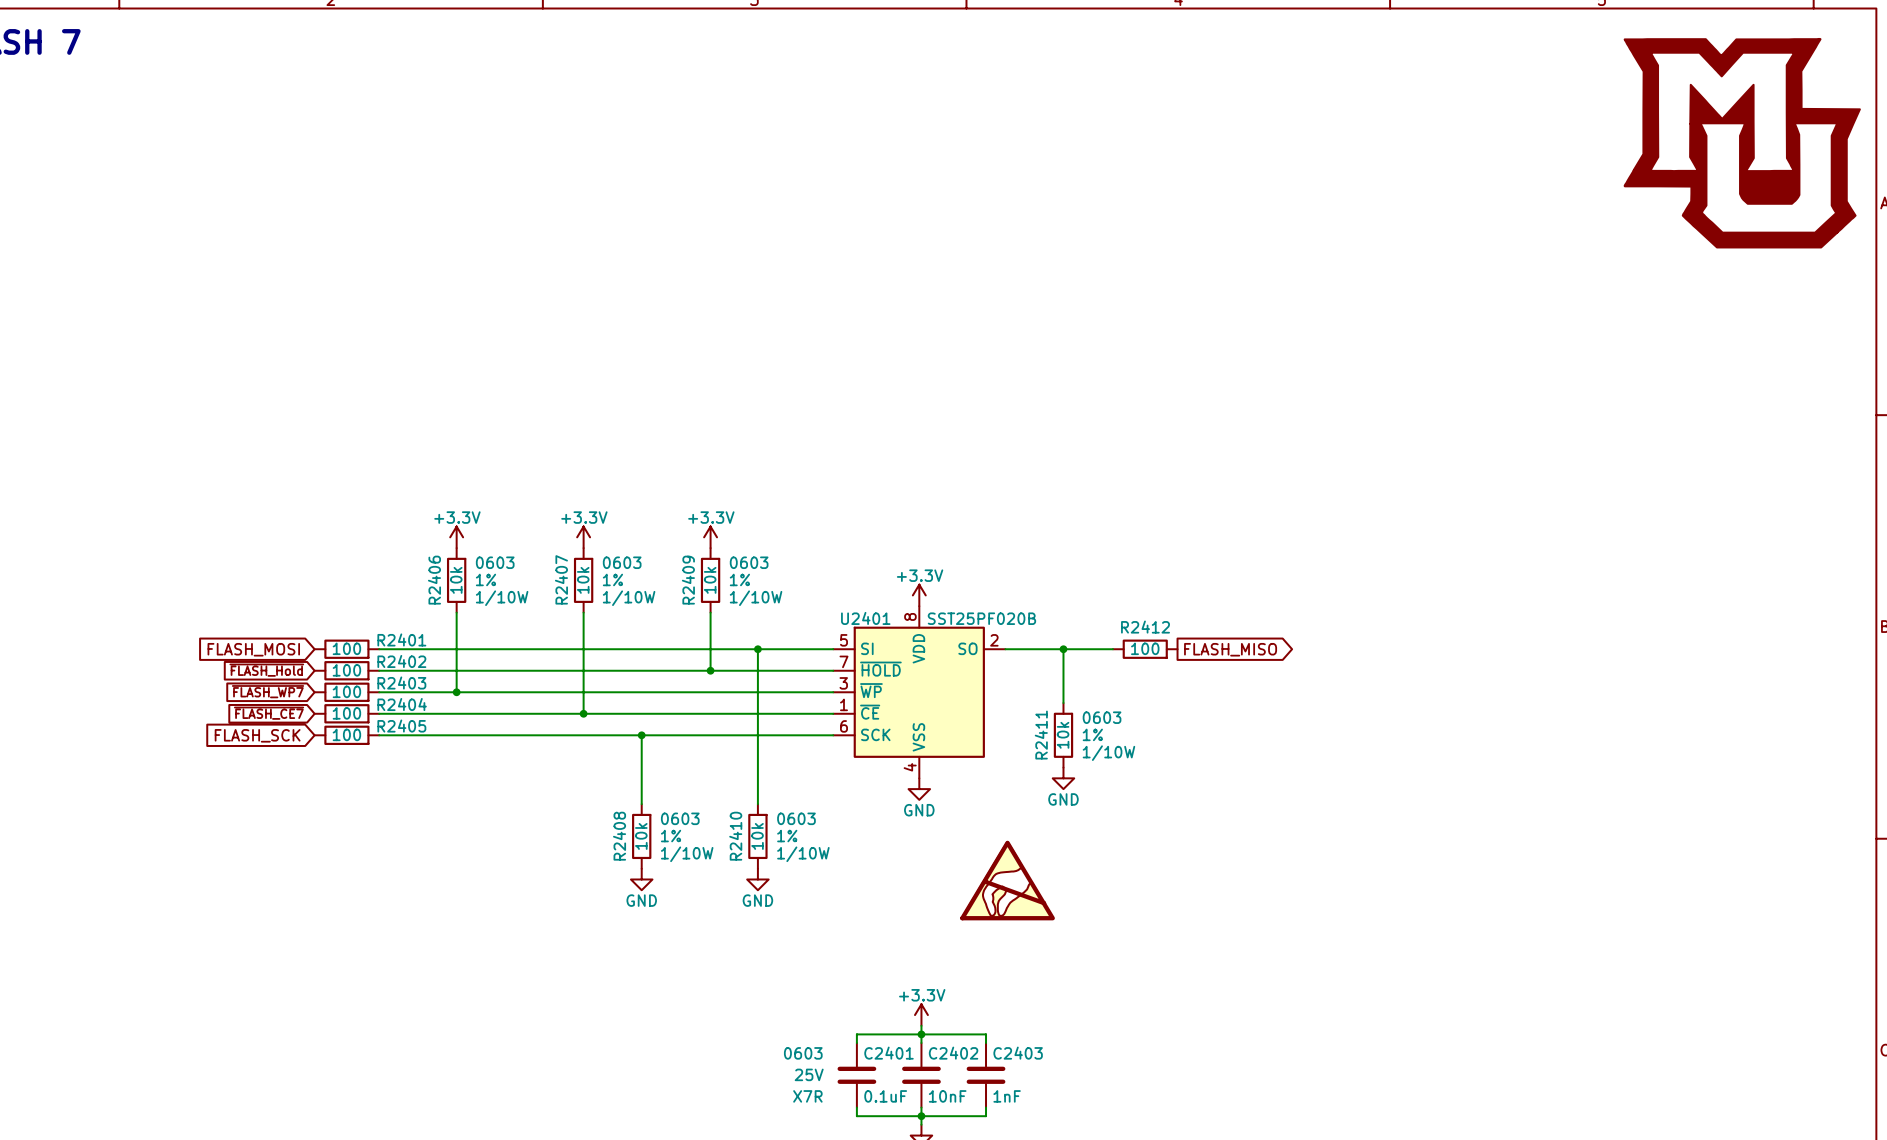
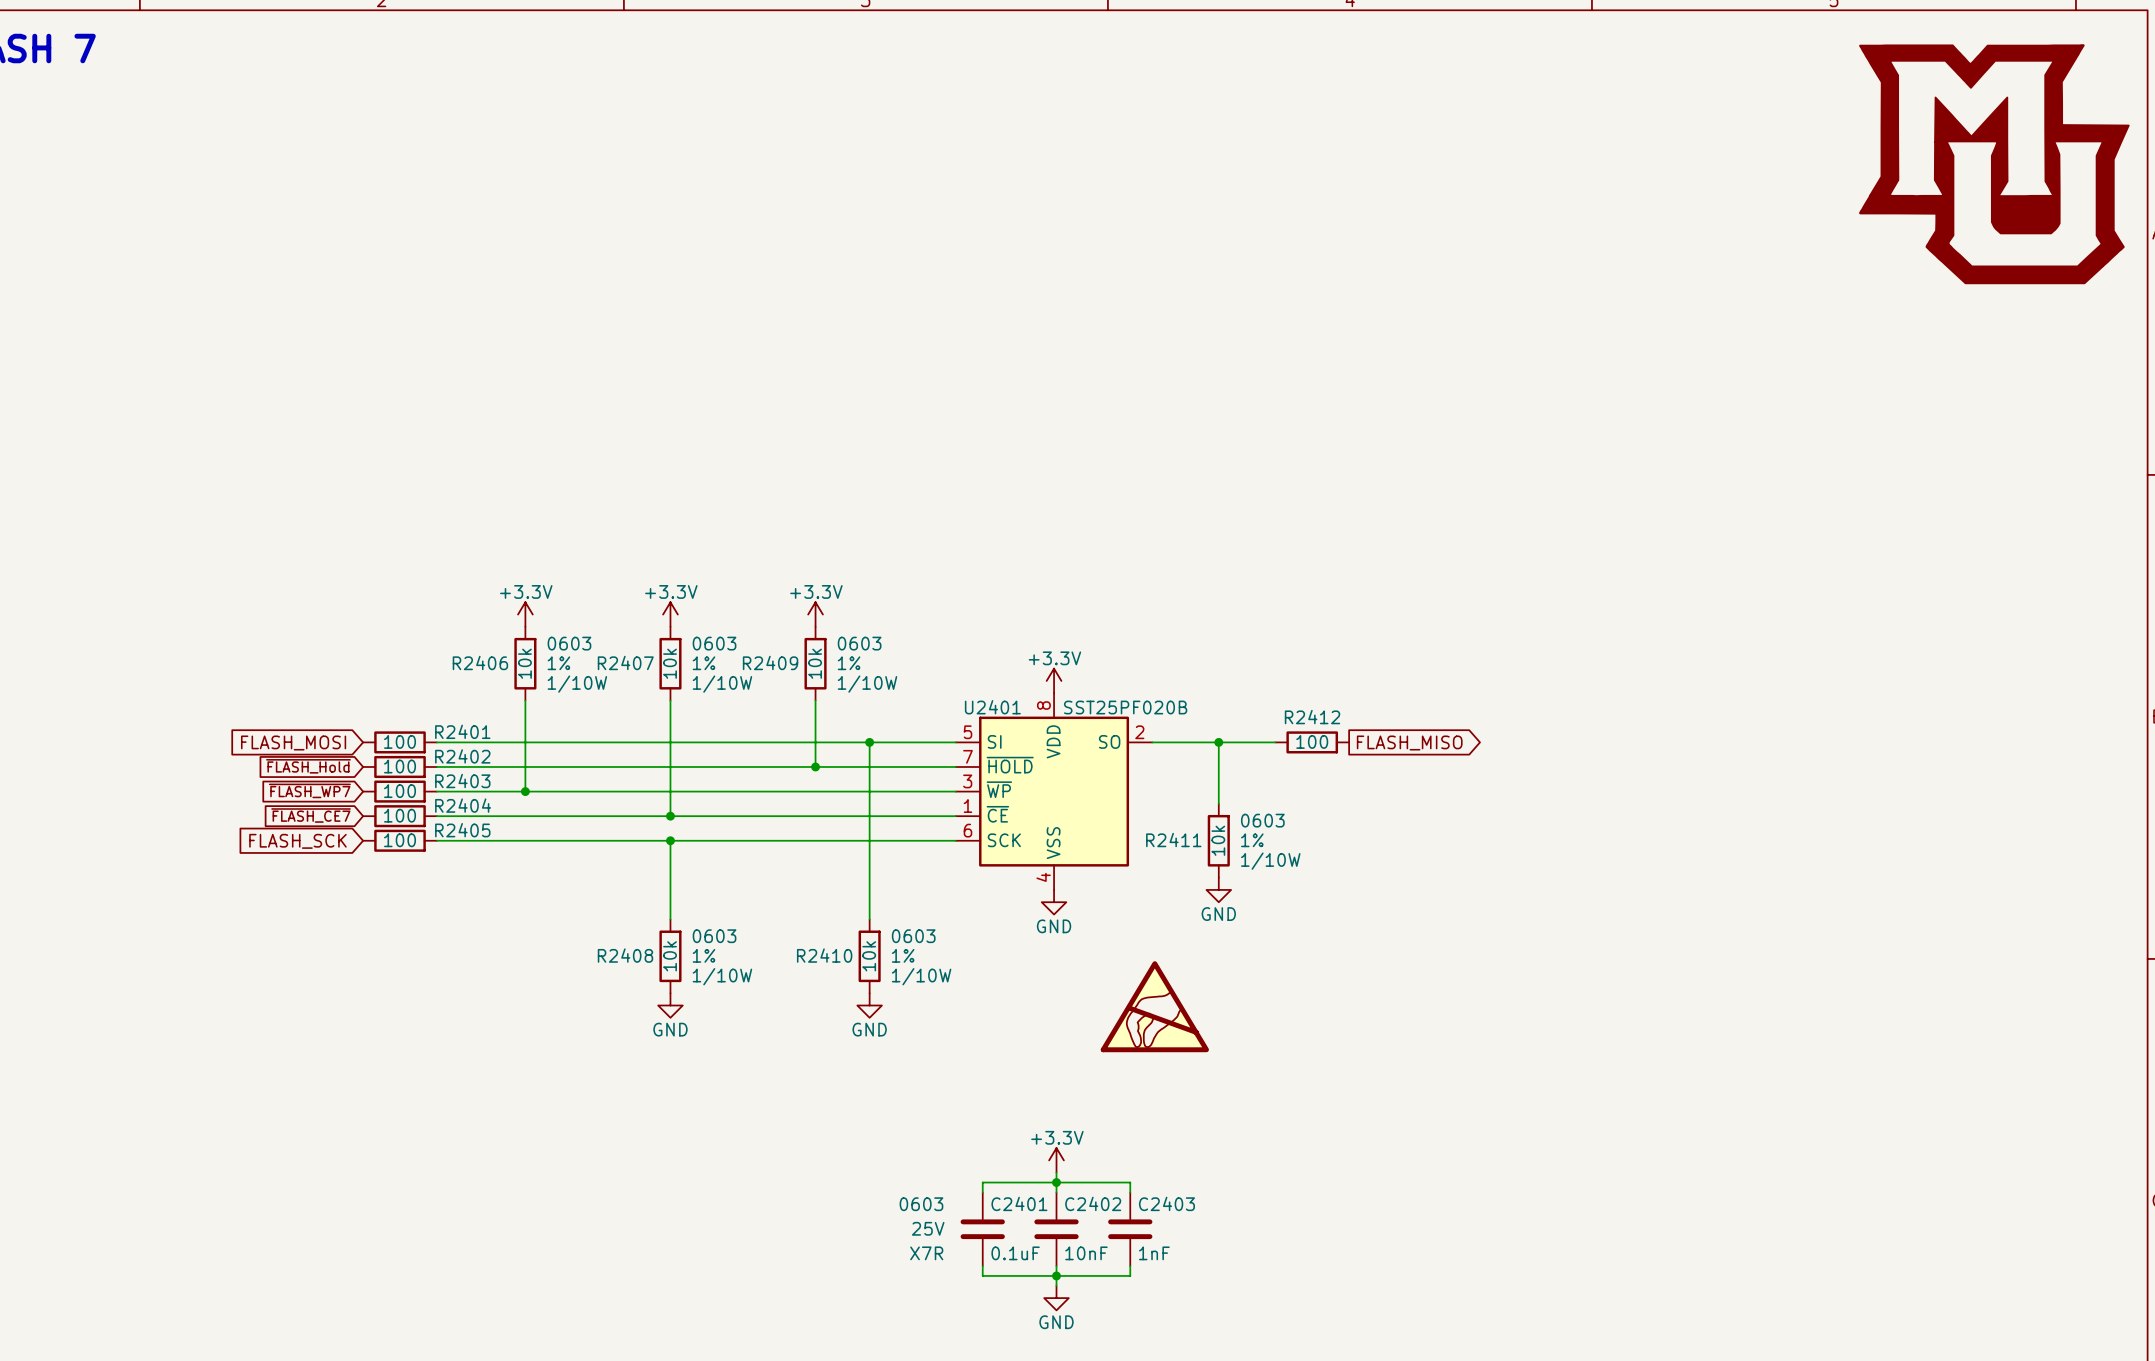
R2407 name rotation: 0° (561, 579) -> 90° clockwise (625, 662)
R2406 name rotation: 0° (434, 580) -> 90° clockwise (480, 662)
R2409 name rotation: 0° (688, 580) -> 90° clockwise (770, 662)
junction: none -> (670, 840)
wire: (641, 735) (641, 804) -> (670, 840) (670, 919)
junction: (641, 735) -> none
R2411 name rotation: 0° (1041, 735) -> 90° clockwise (1173, 840)
R2408 name rotation: 0° (619, 836) -> 90° clockwise (625, 955)
R2408 position: (641, 836) -> (670, 956)
R2410 name rotation: 0° (735, 836) -> 90° clockwise (824, 955)
power symbol position: GND (641, 879) -> GND (670, 1005)

